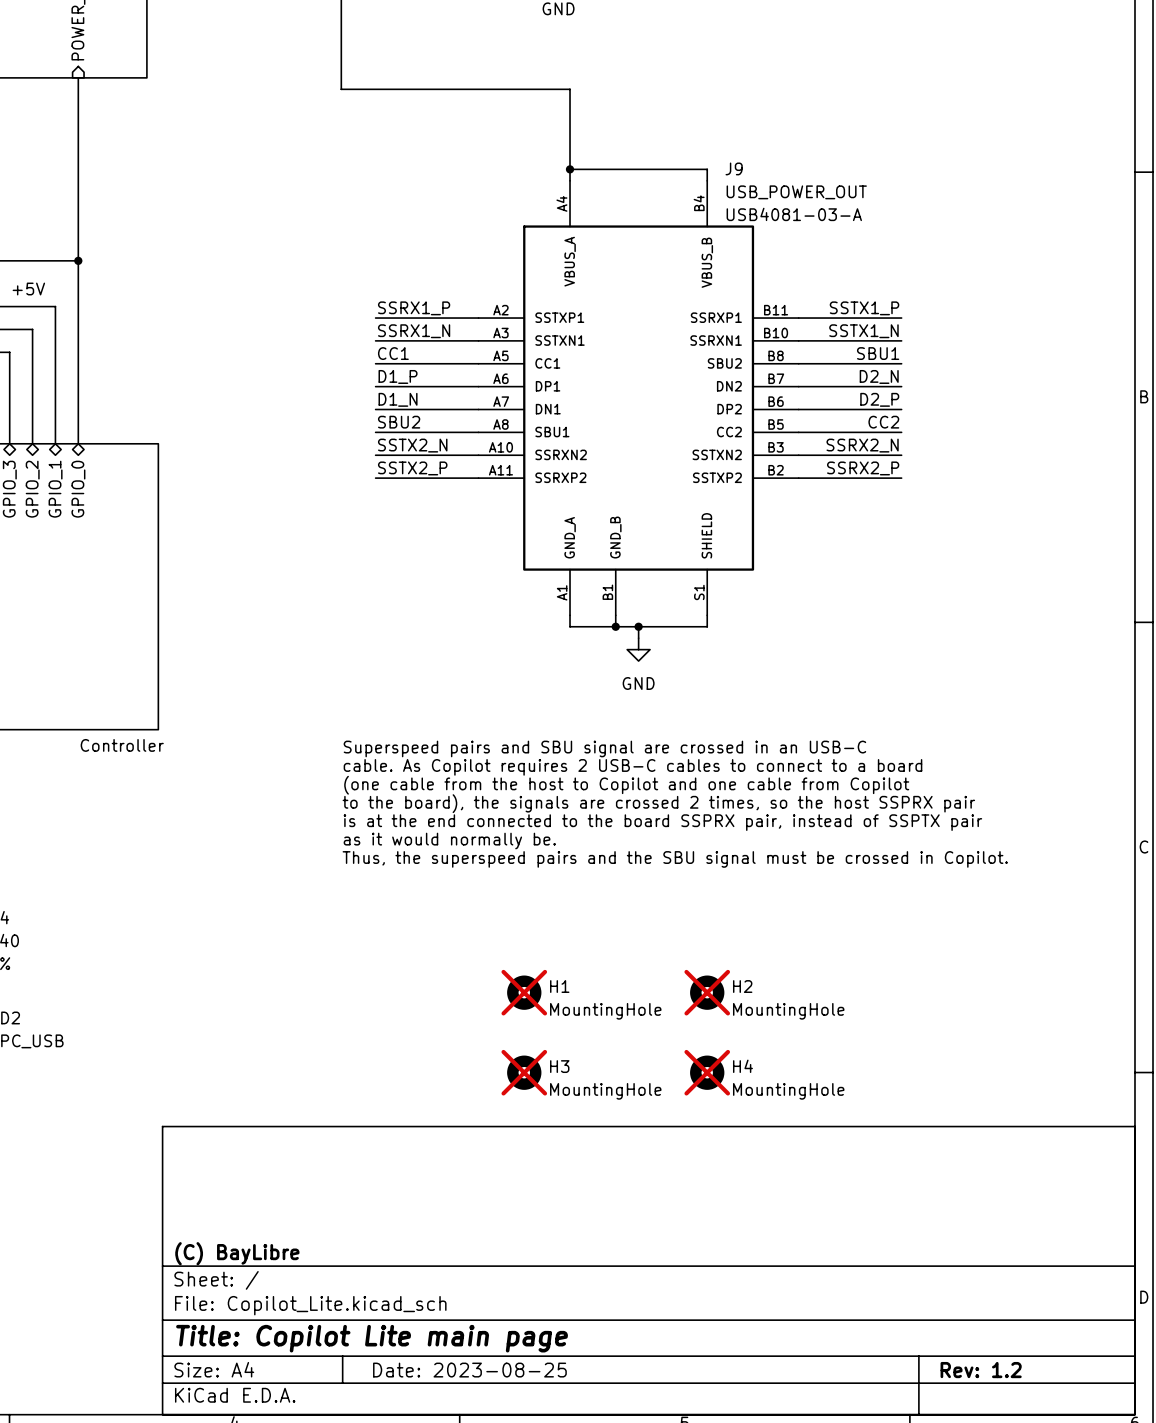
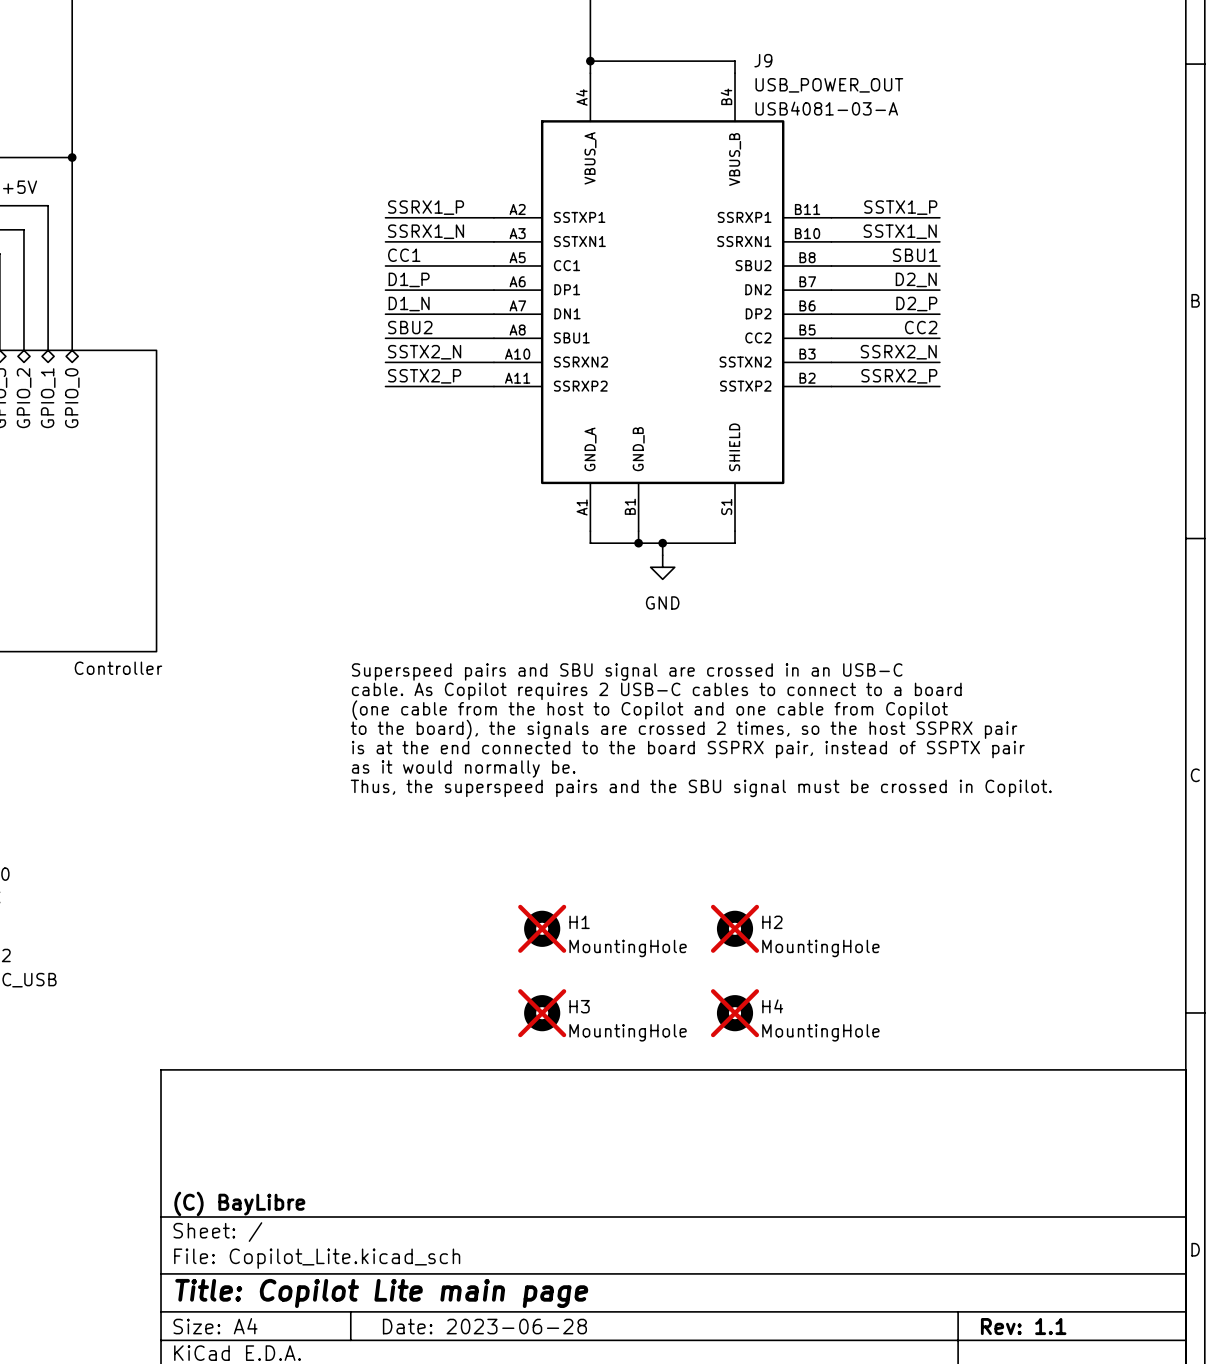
title block: Date: 2023-08-25 (469, 1370) -> Date: 2023-06-28 (484, 1326)
title block: Rev: 1.2 (981, 1370) -> Rev: 1.1 (1023, 1326)

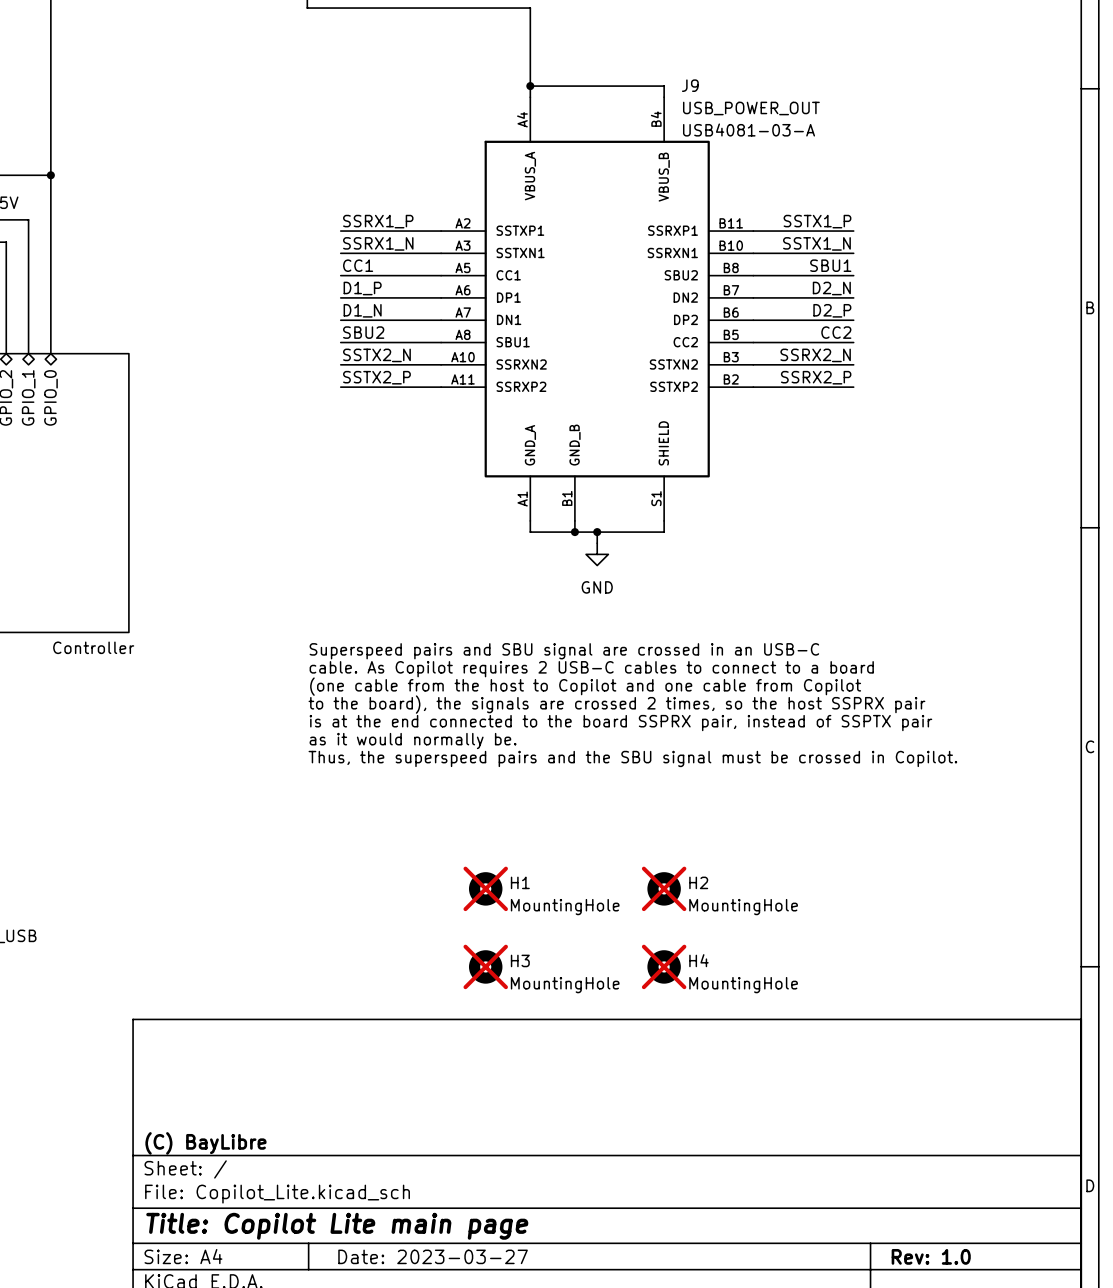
title block: Date: 2023-06-28 (484, 1326) -> Date: 2023-03-27 (433, 1256)
title block: Rev: 1.1 (1023, 1326) -> Rev: 1.0 (931, 1256)

